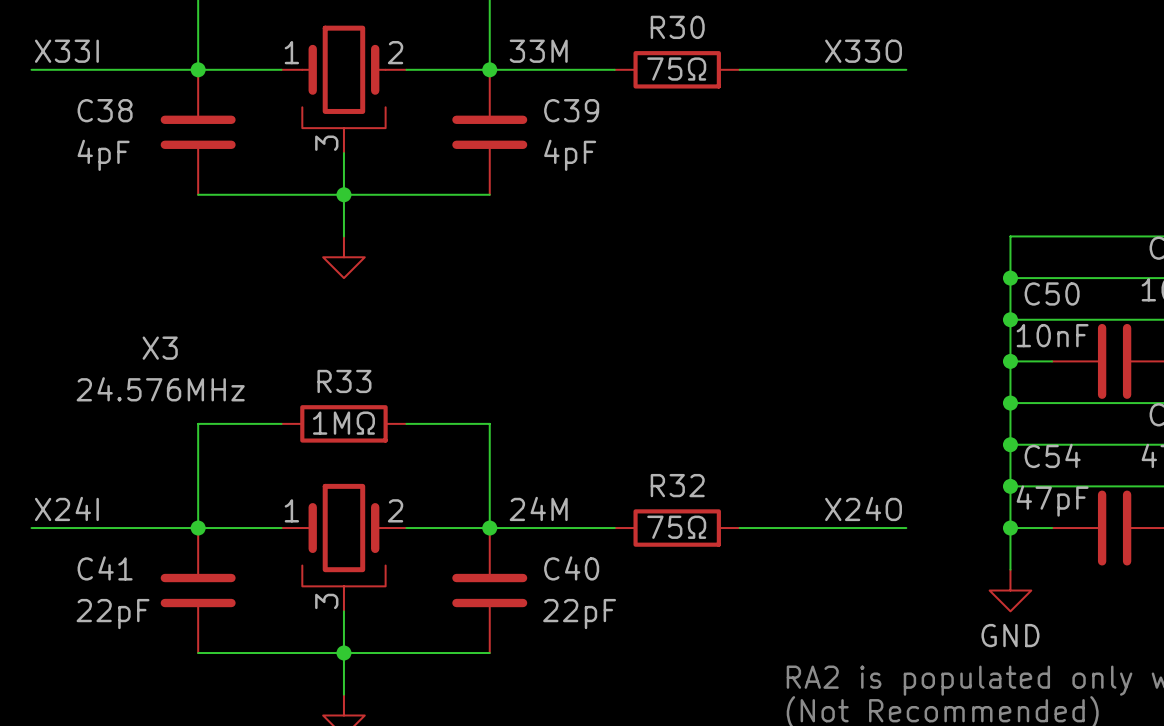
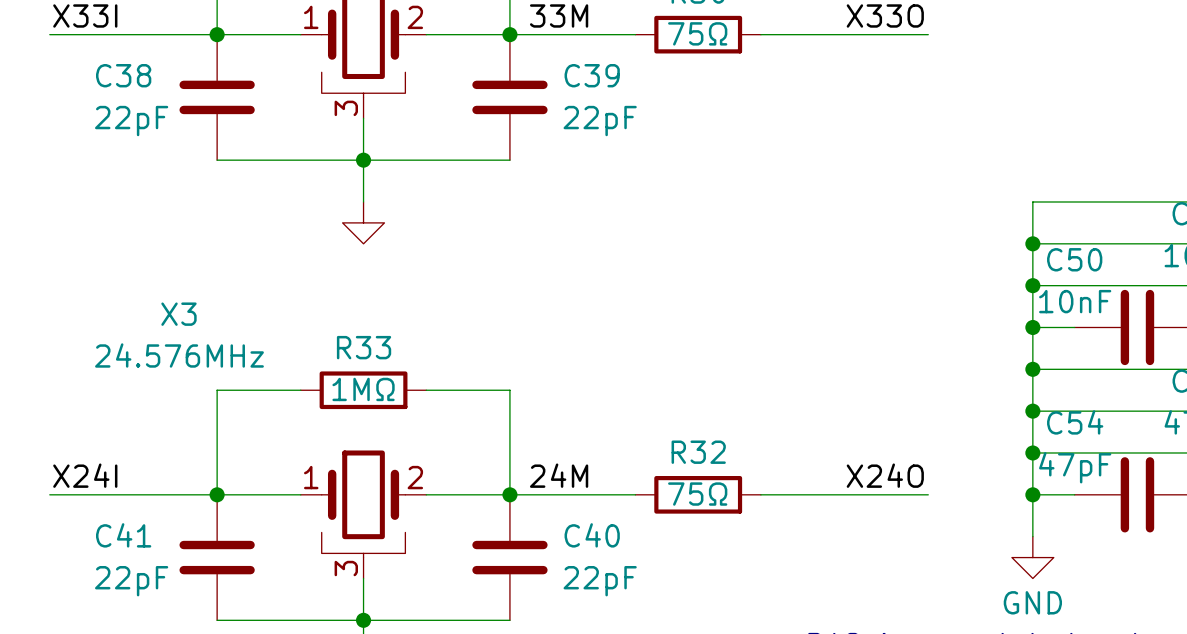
C38 value: 4pF (103, 155) -> 22pF (131, 121)
C39 value: 4pF (570, 155) -> 22pF (600, 121)

